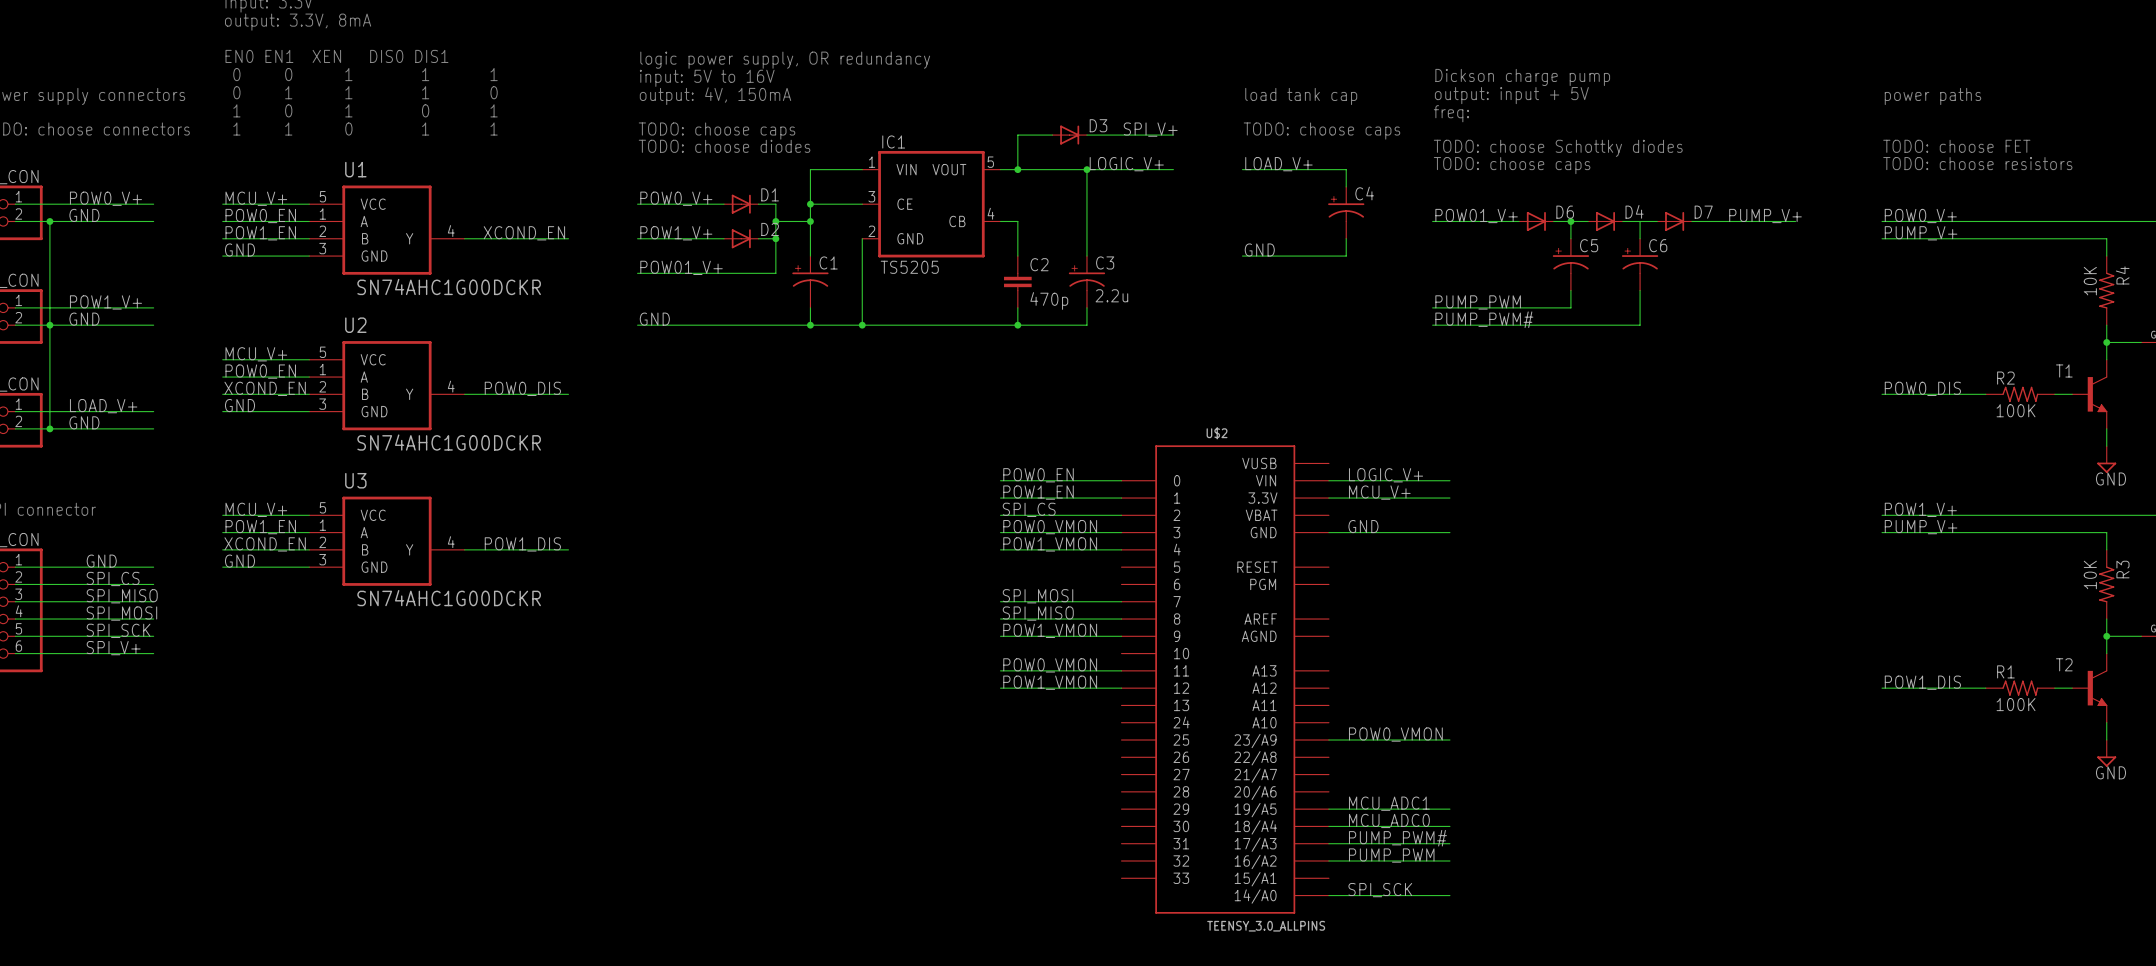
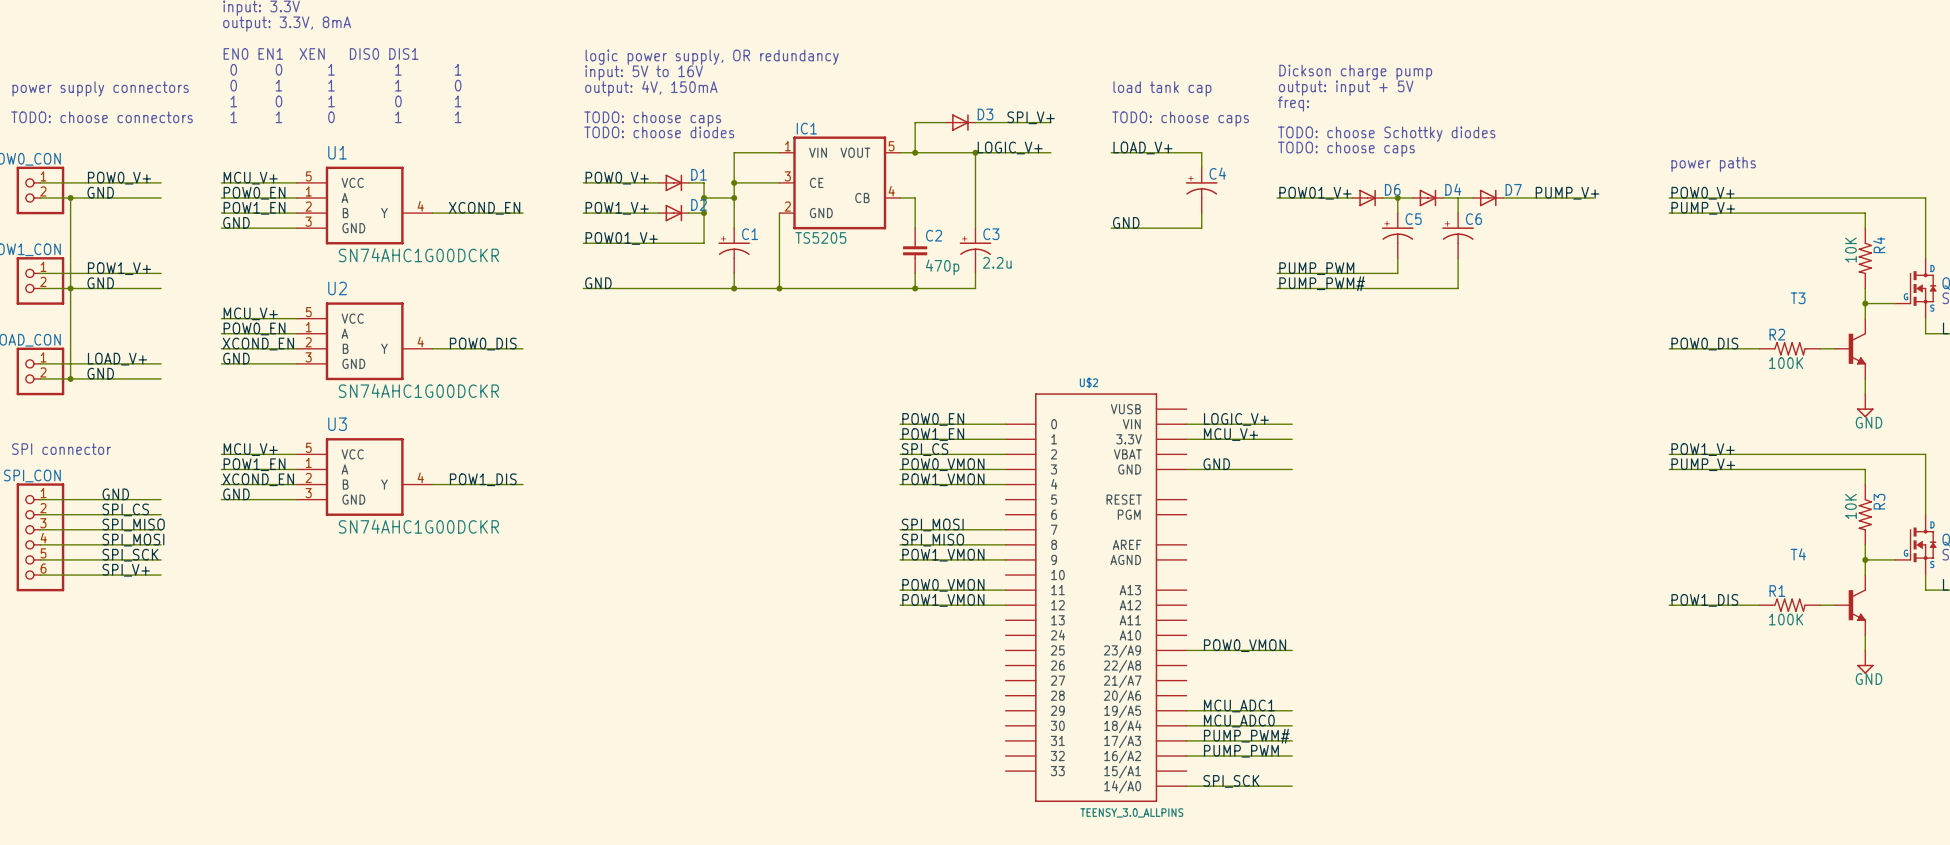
text position: power paths (1932, 96) -> power paths (1713, 164)
text: TODO: choose FET (1956, 146) -> none
text: TODO: choose resistors (1977, 163) -> none
T1 name: T1 (2064, 370) -> T3 (1798, 298)
T2 name: T2 (2064, 664) -> T4 (1798, 554)

